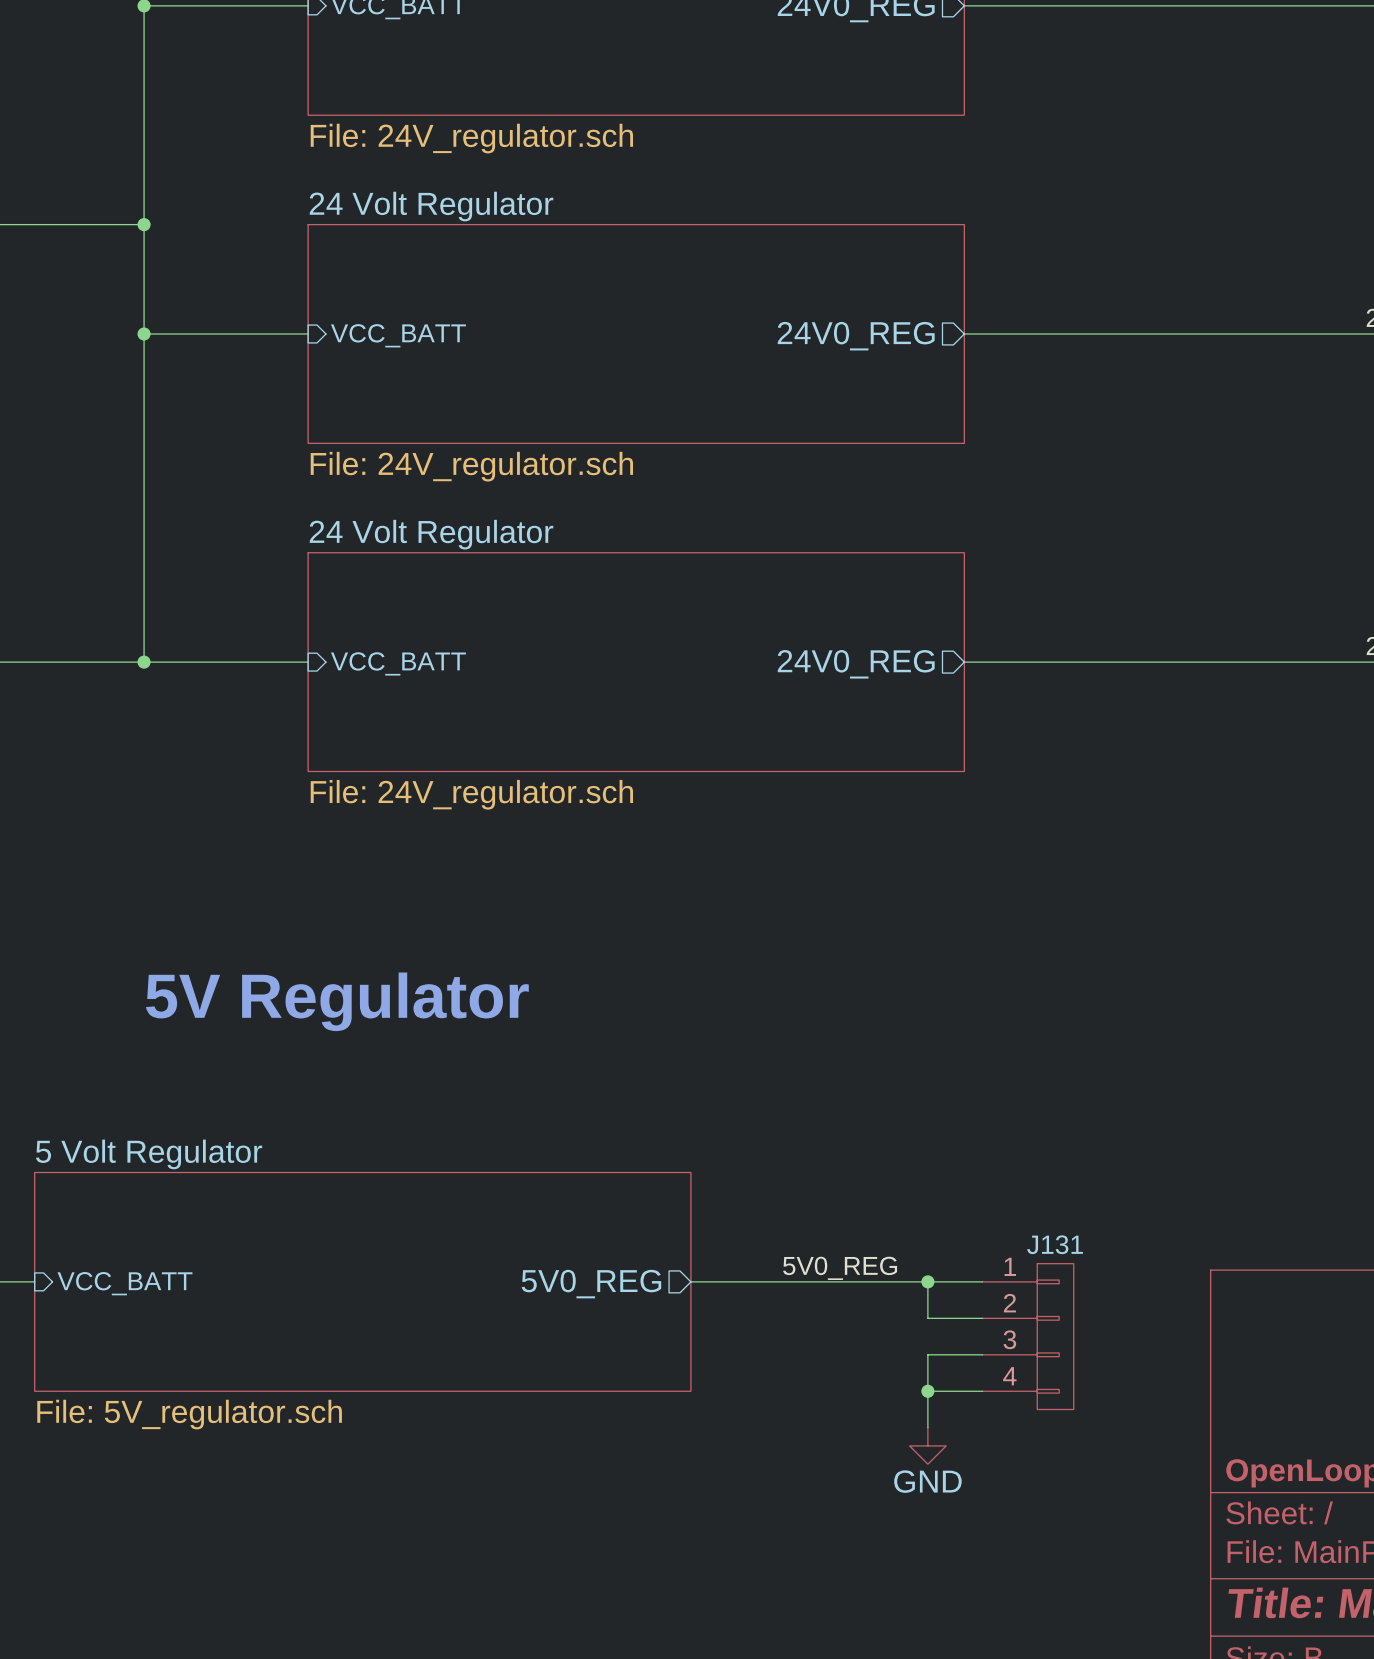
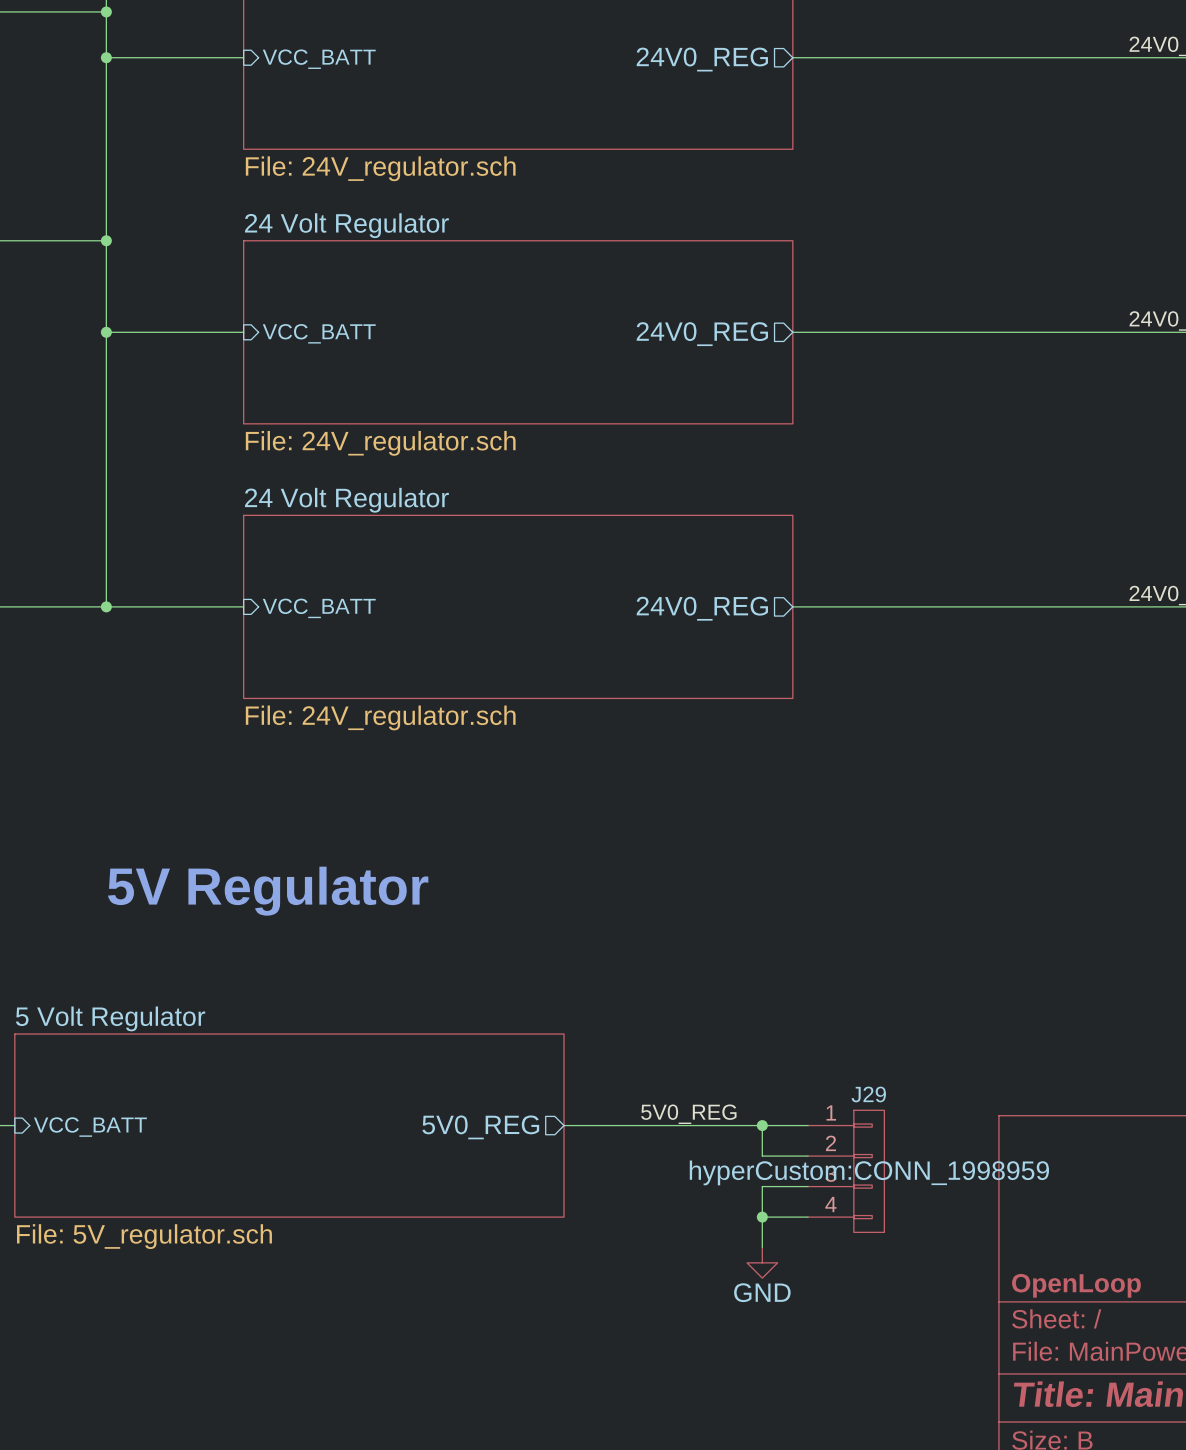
J131 name: J131 (1055, 1244) -> J29 (868, 1094)
J131 text: none -> hyperCustom:CONN_1998959 (869, 1172)

